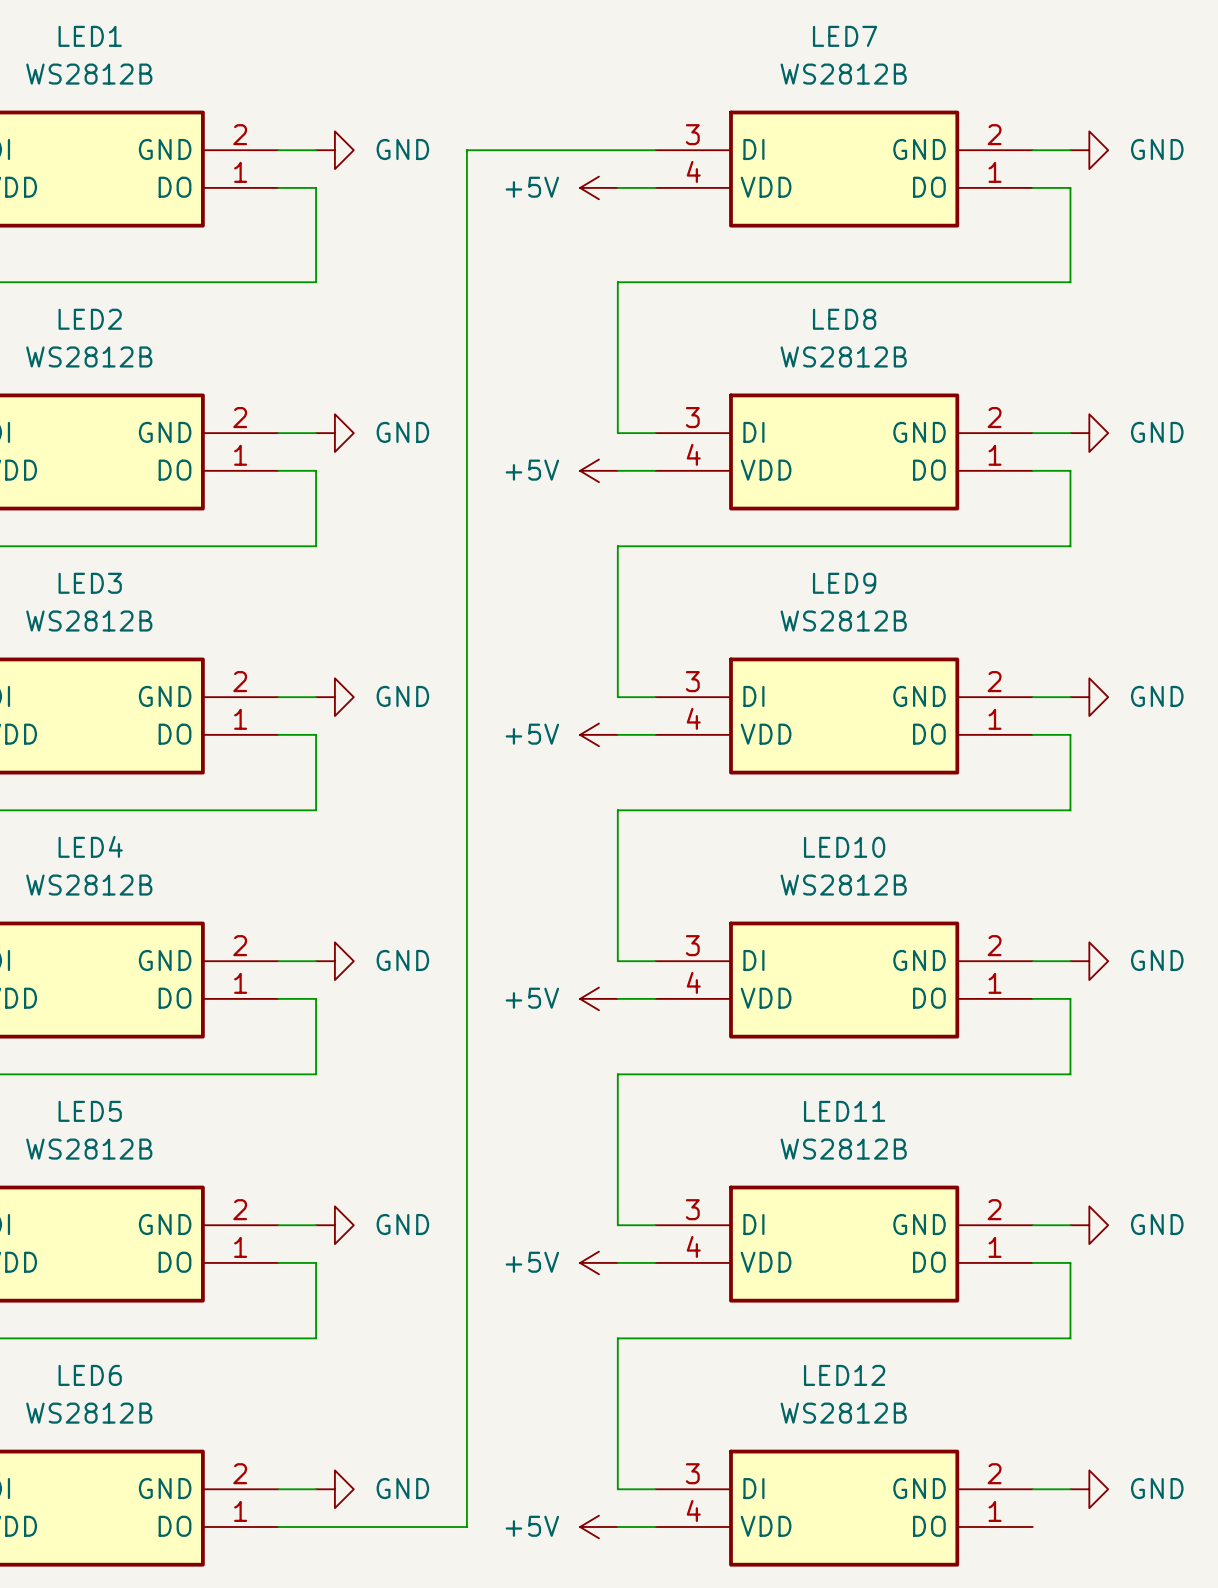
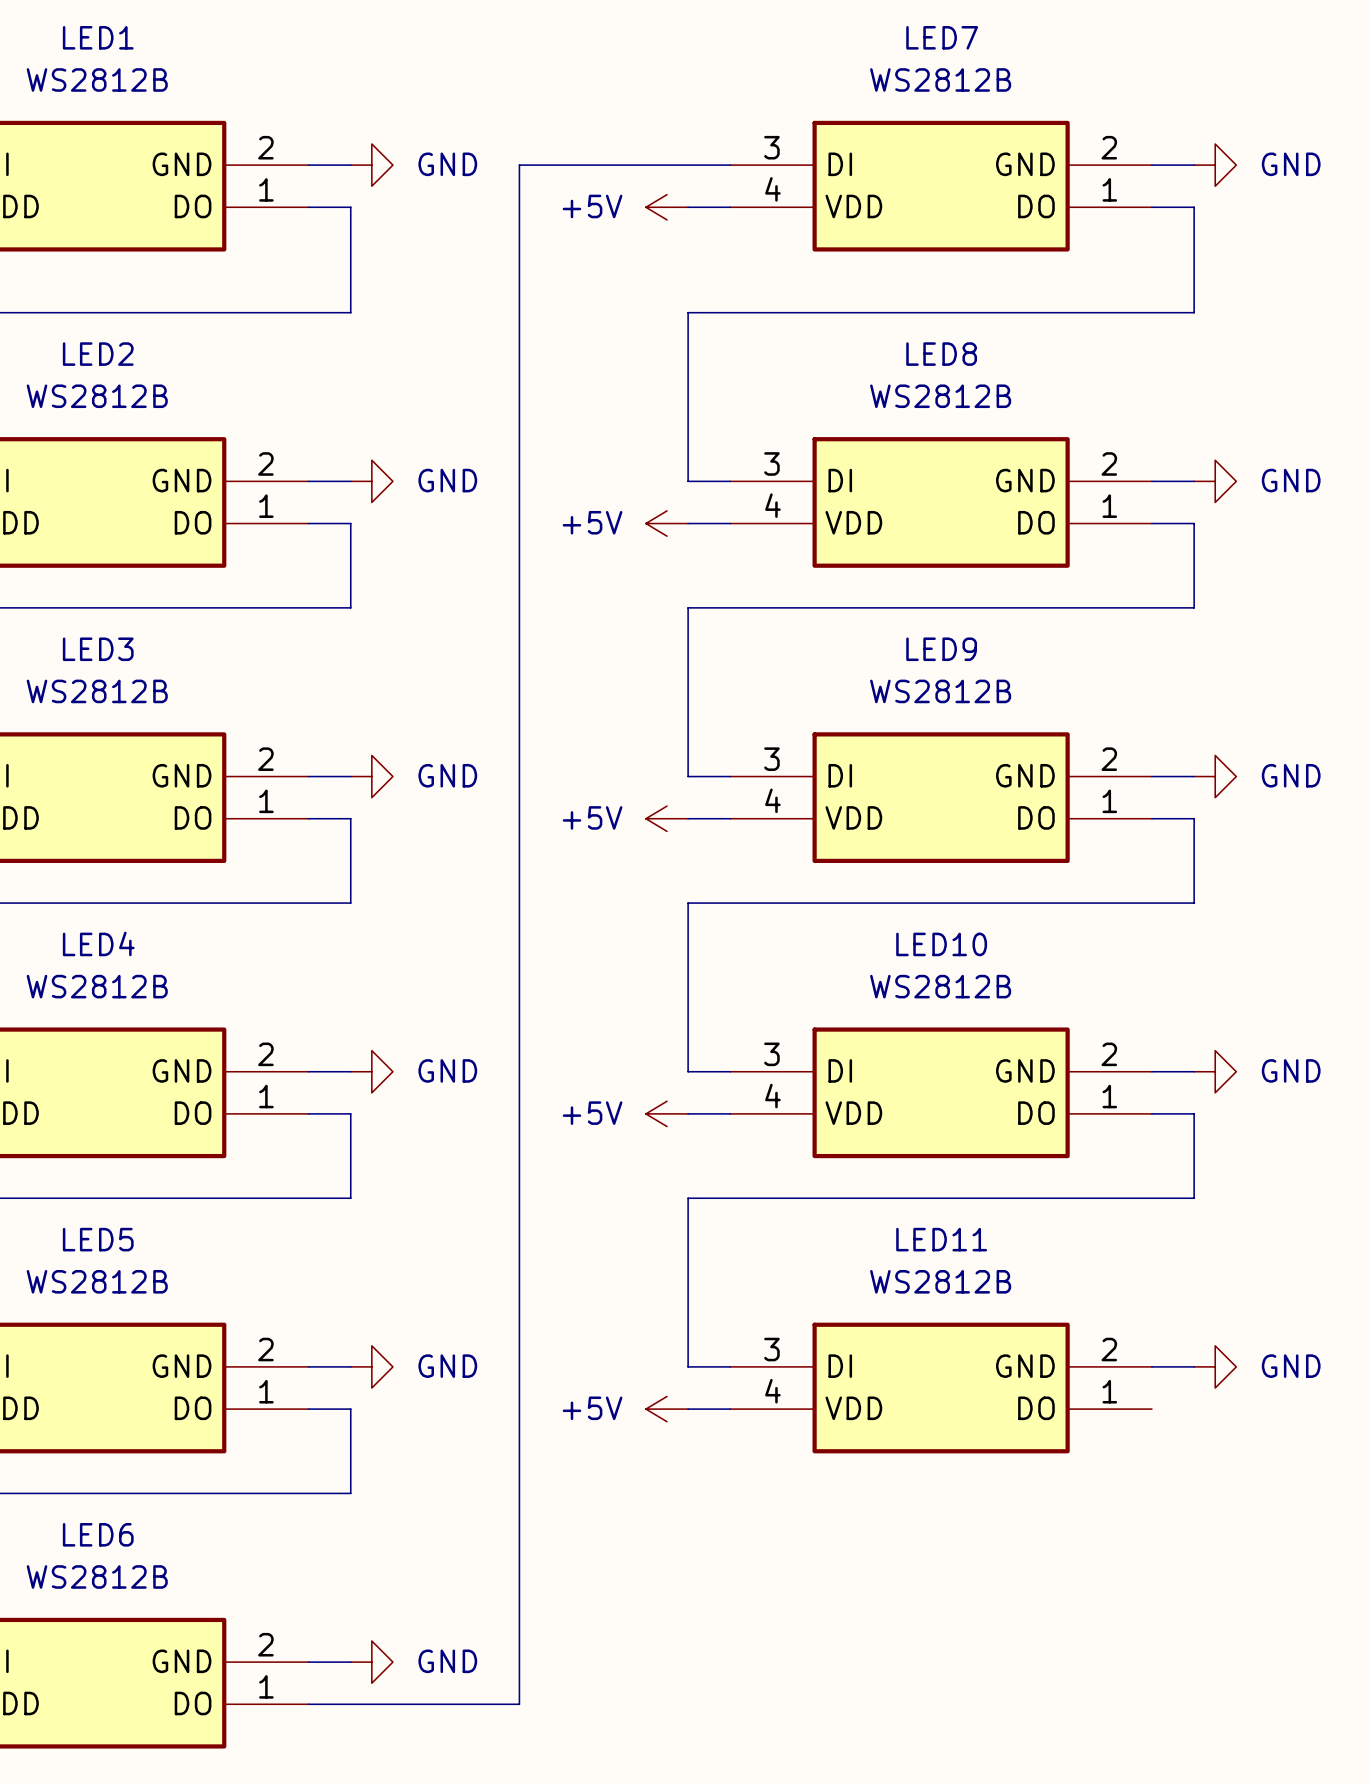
wire: (1032, 1262) (1070, 1262) (1070, 1338) (617, 1338) (617, 1489) (655, 1489) -> none
wire: (1032, 1489) (1070, 1489) -> none
power symbol: GND (1089, 1489) -> none
LED12: WS2812B (844, 1508) -> none
power symbol: +5V (598, 1526) -> none
wire: (617, 1526) (655, 1526) -> none

